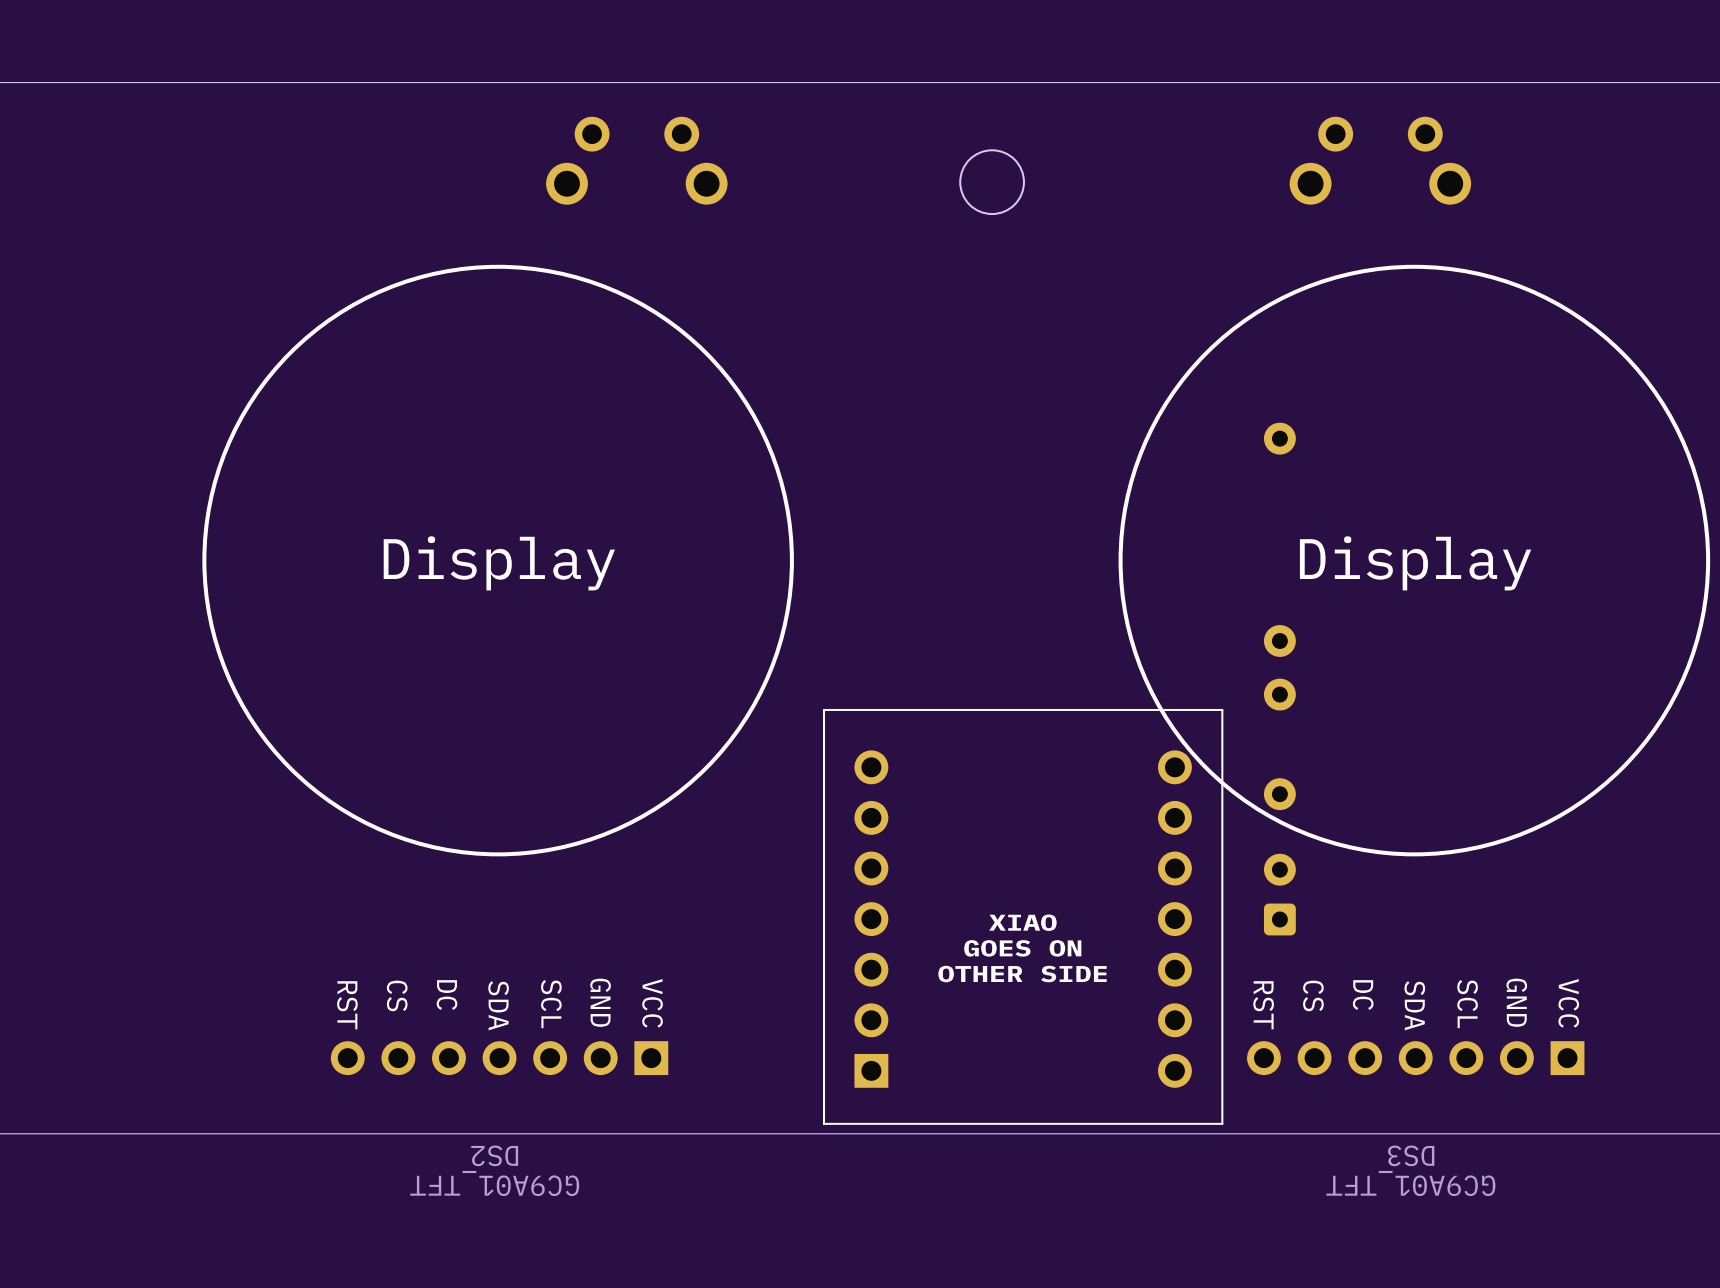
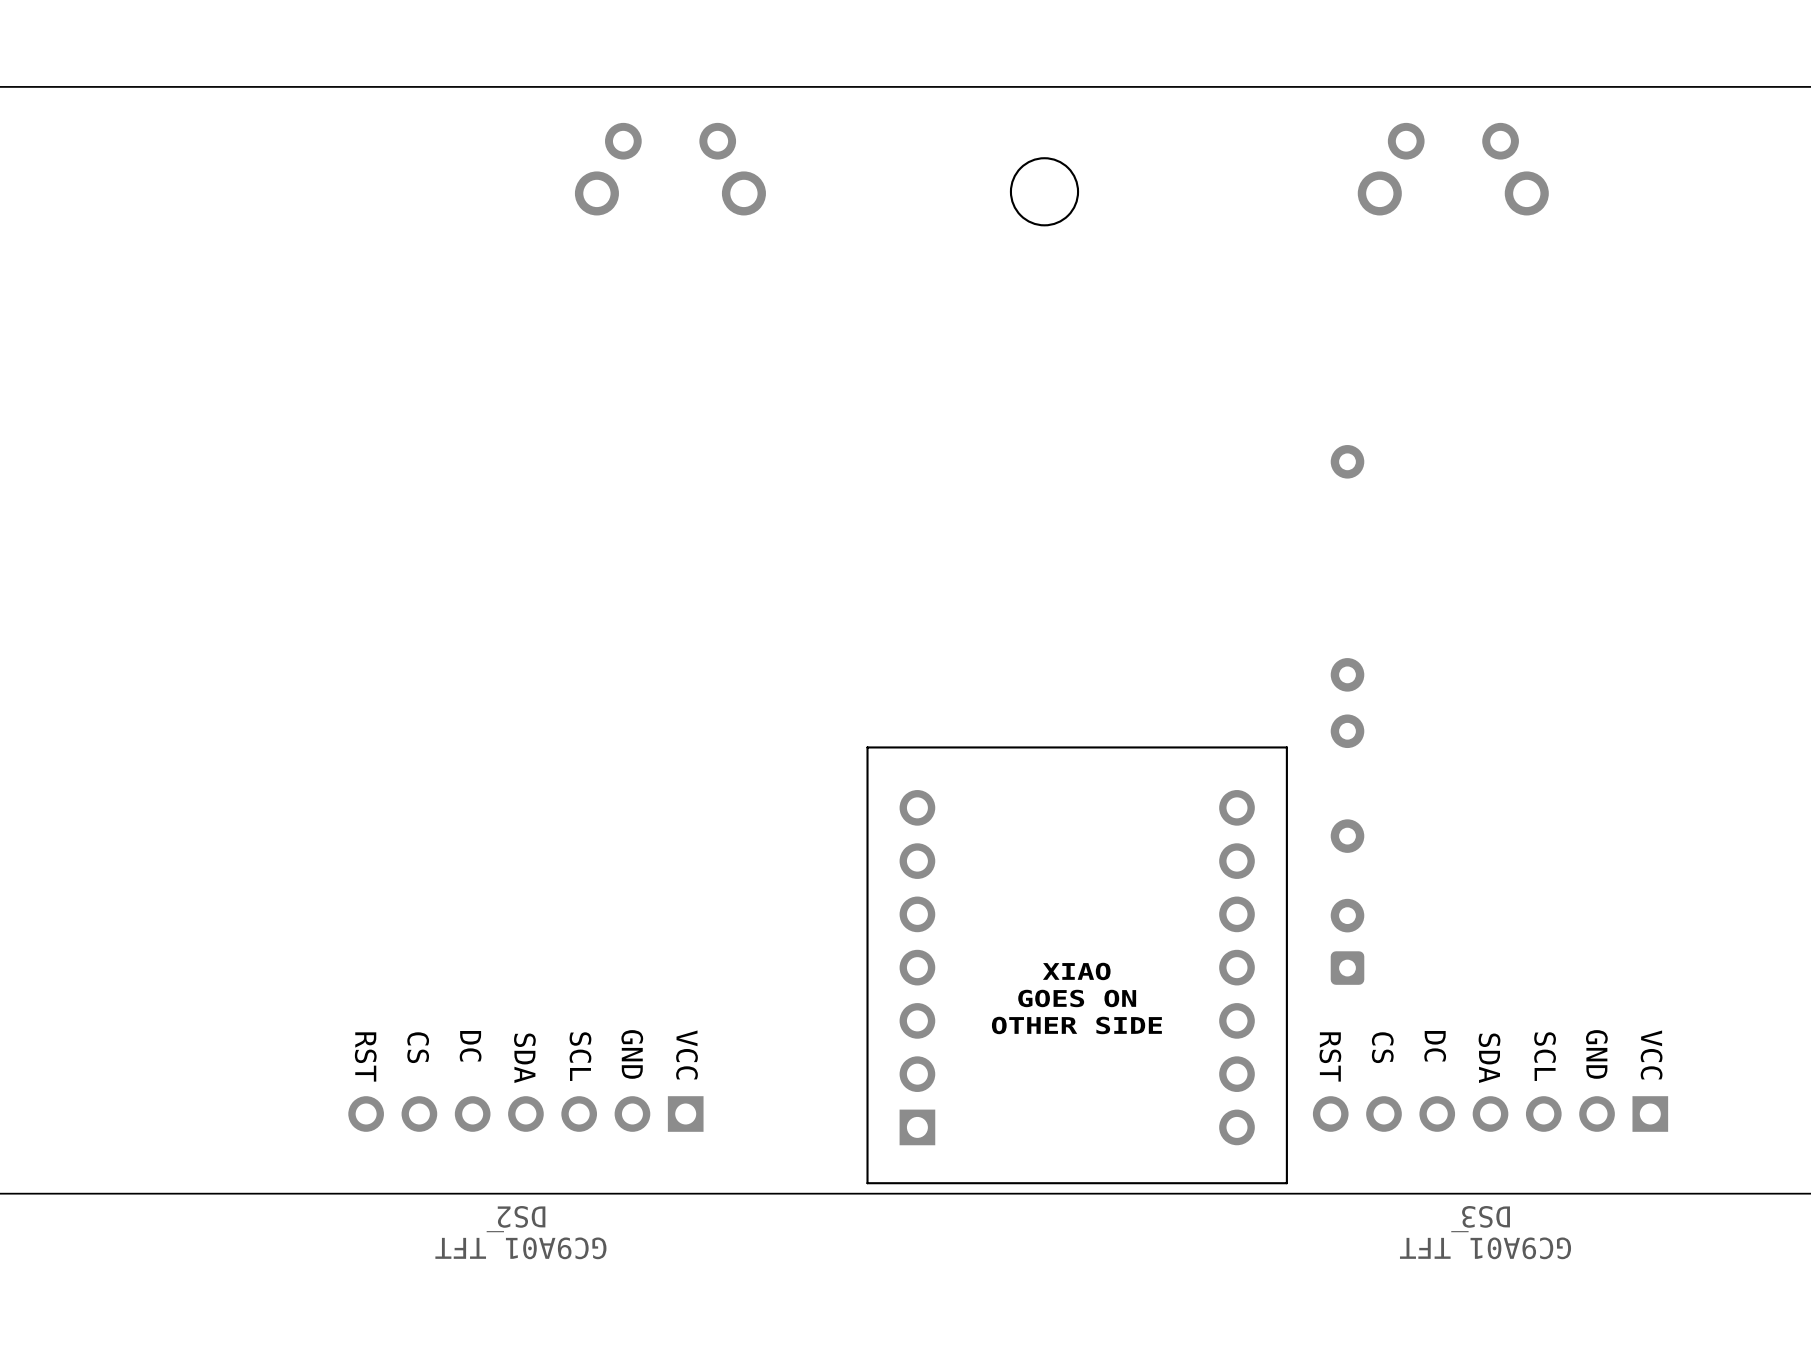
drawing: [202, 264, 794, 857] -> none
drawing: [1118, 264, 1711, 857] -> none
text: Display (499, 563) -> none
text: Display (1415, 563) -> none

